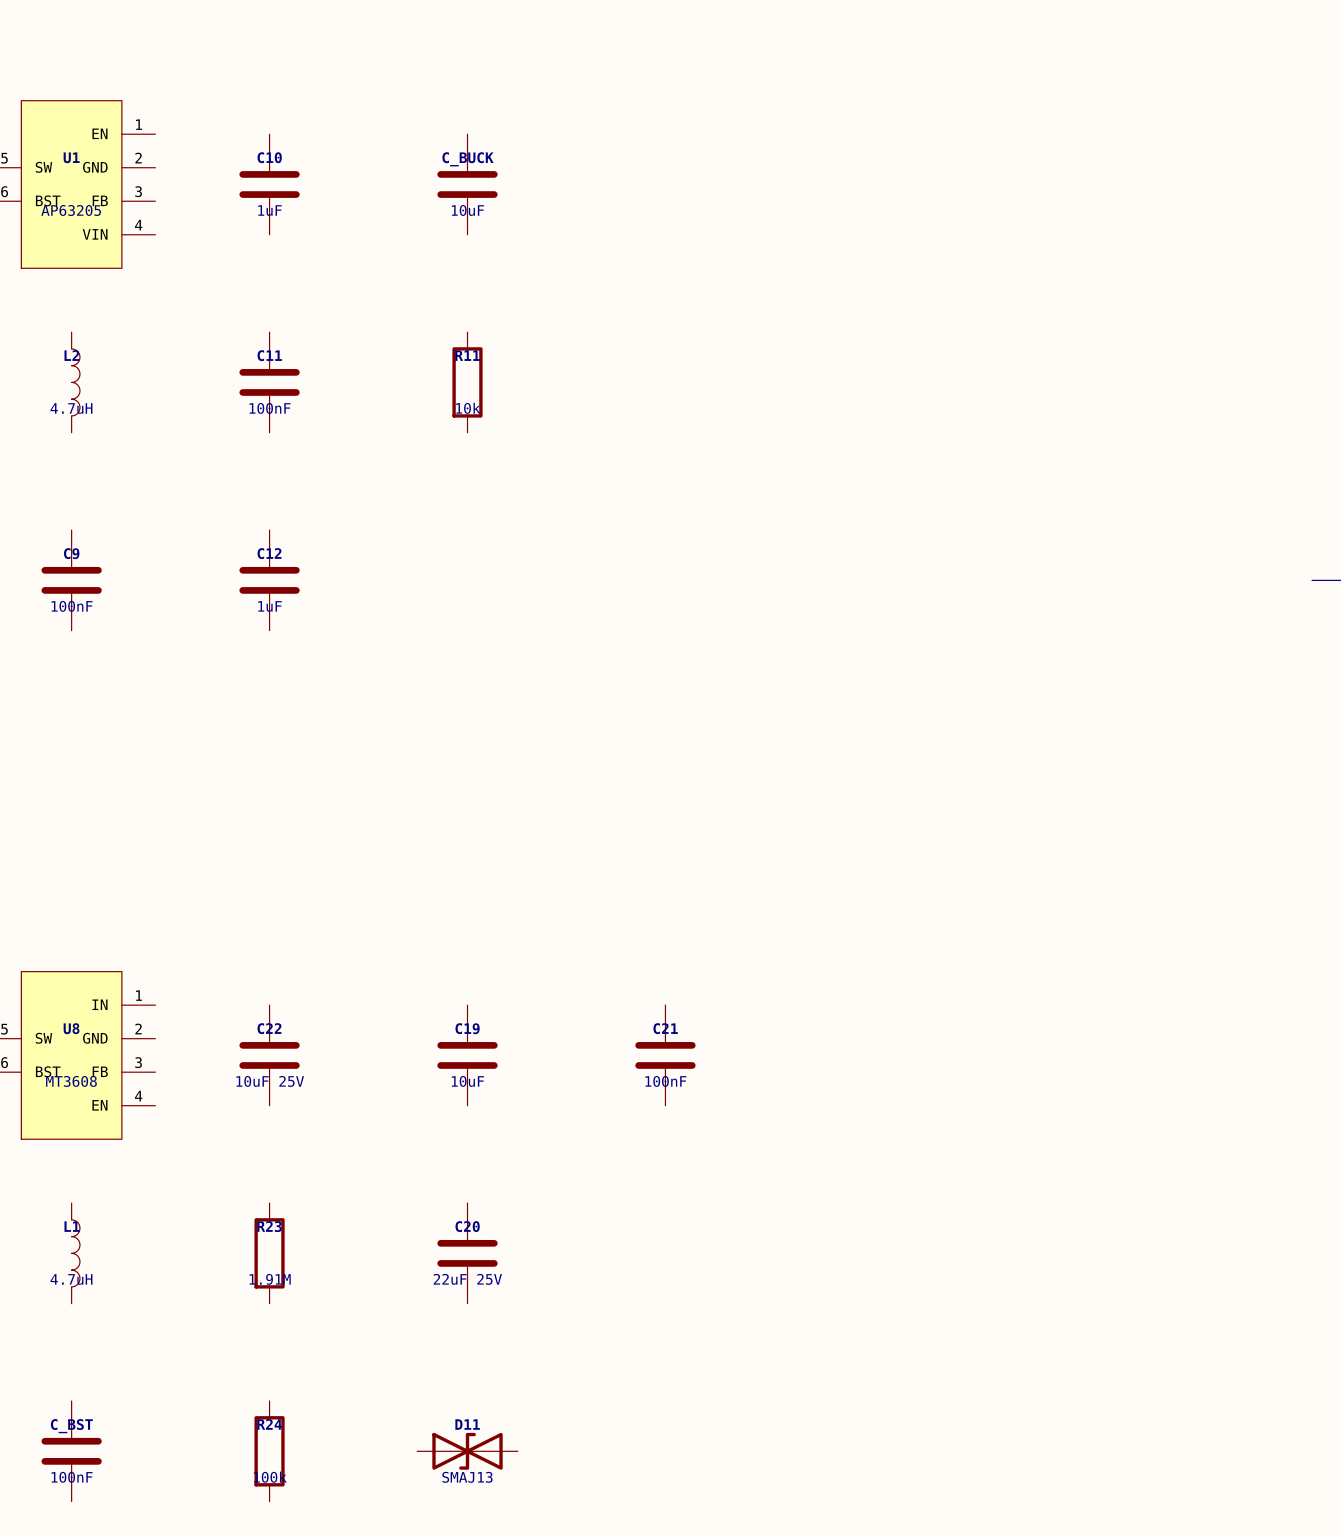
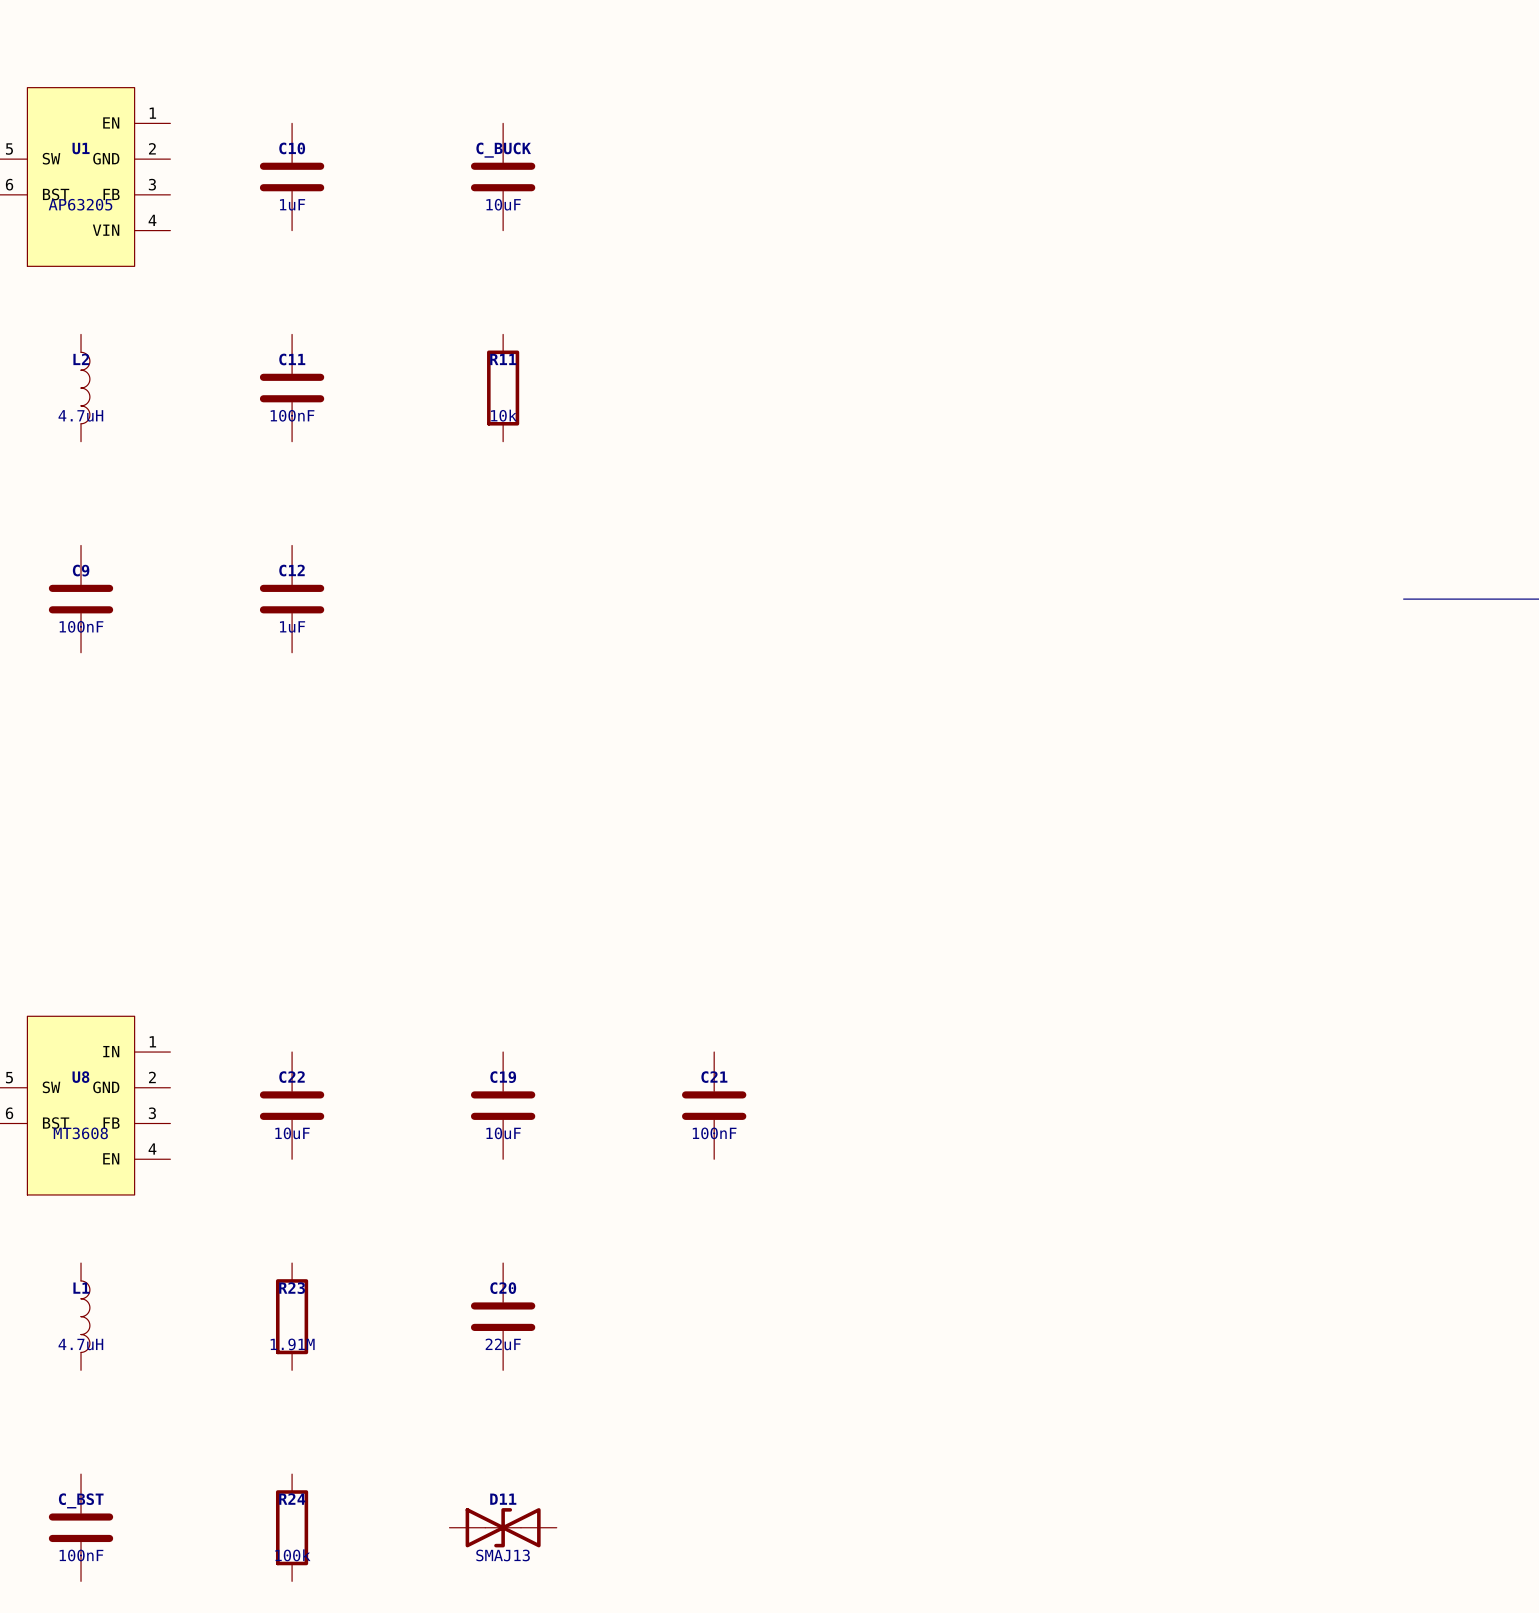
C22 value: 10uF 25V (270, 1081) -> 10uF (292, 1133)
C20 value: 22uF 25V (467, 1279) -> 22uF (503, 1344)

